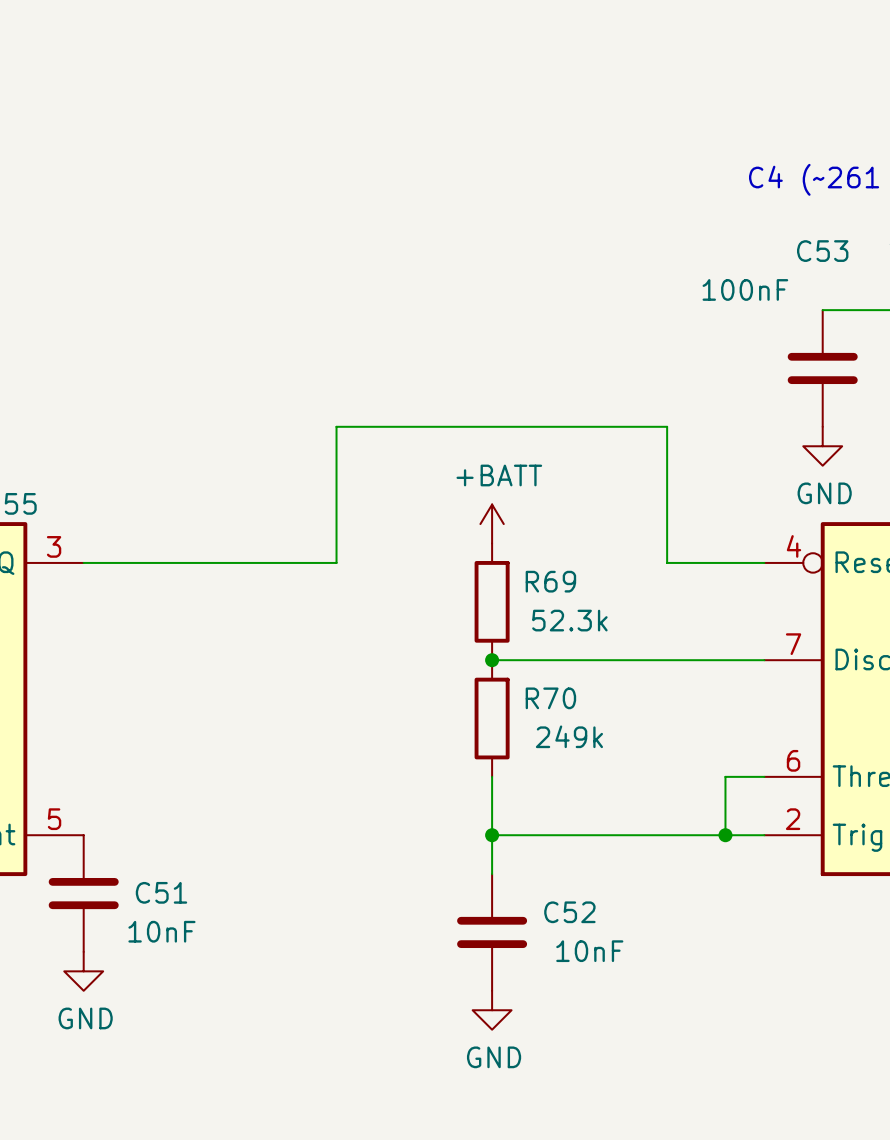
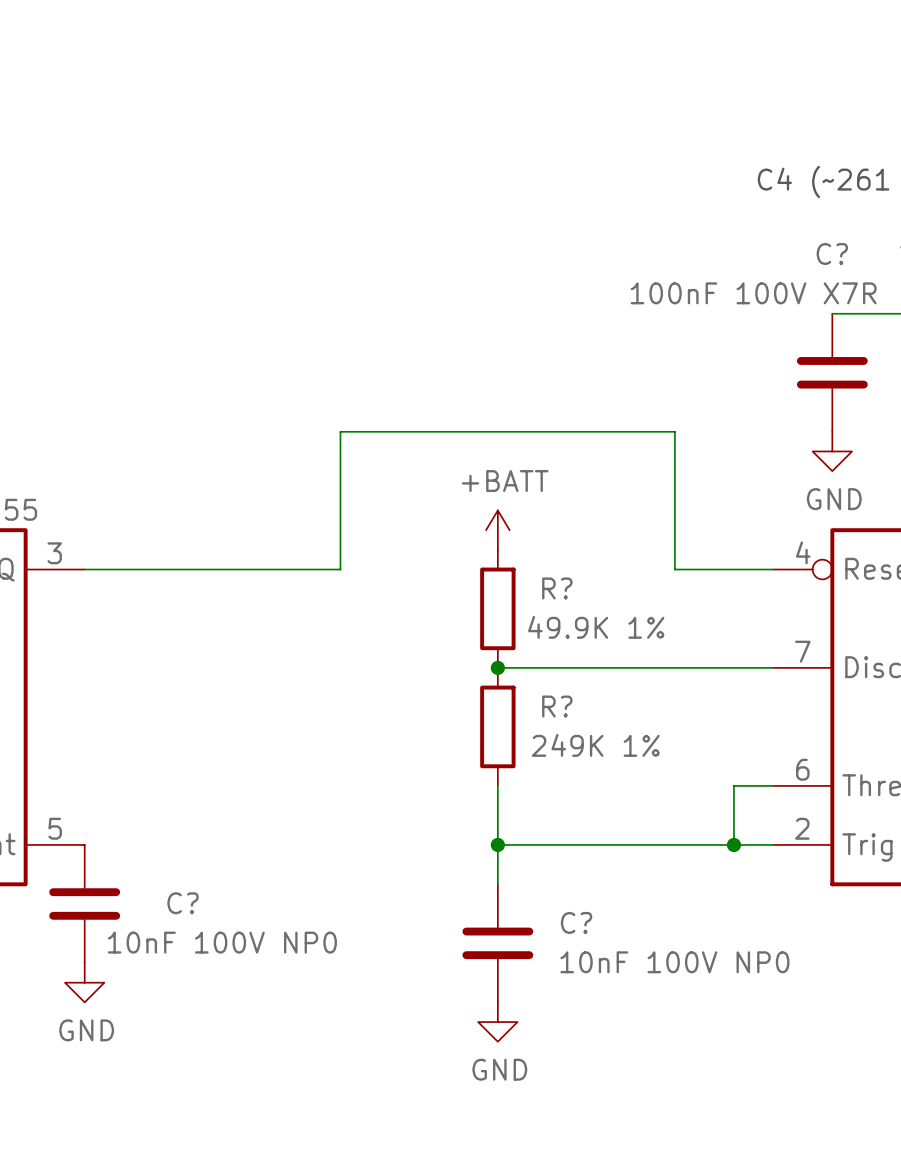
C53 name: C53 (822, 251) -> C? (832, 253)
C53 value: 100nF (745, 289) -> 100nF 100V X7R (753, 293)
R69 name: R69 (550, 581) -> R? (557, 588)
R69 value: 52.3k (569, 620) -> 49.9K 1% (596, 627)
R70 name: R70 (550, 698) -> R? (557, 706)
R70 value: 249k (569, 736) -> 249K 1% (595, 745)
C51 name: C51 (161, 892) -> C? (183, 903)
C52 name: C52 (569, 912) -> C? (576, 922)
C51 value: 10nF (161, 931) -> 10nF 100V NP0 (222, 942)
C52 value: 10nF (589, 951) -> 10nF 100V NP0 (674, 962)

